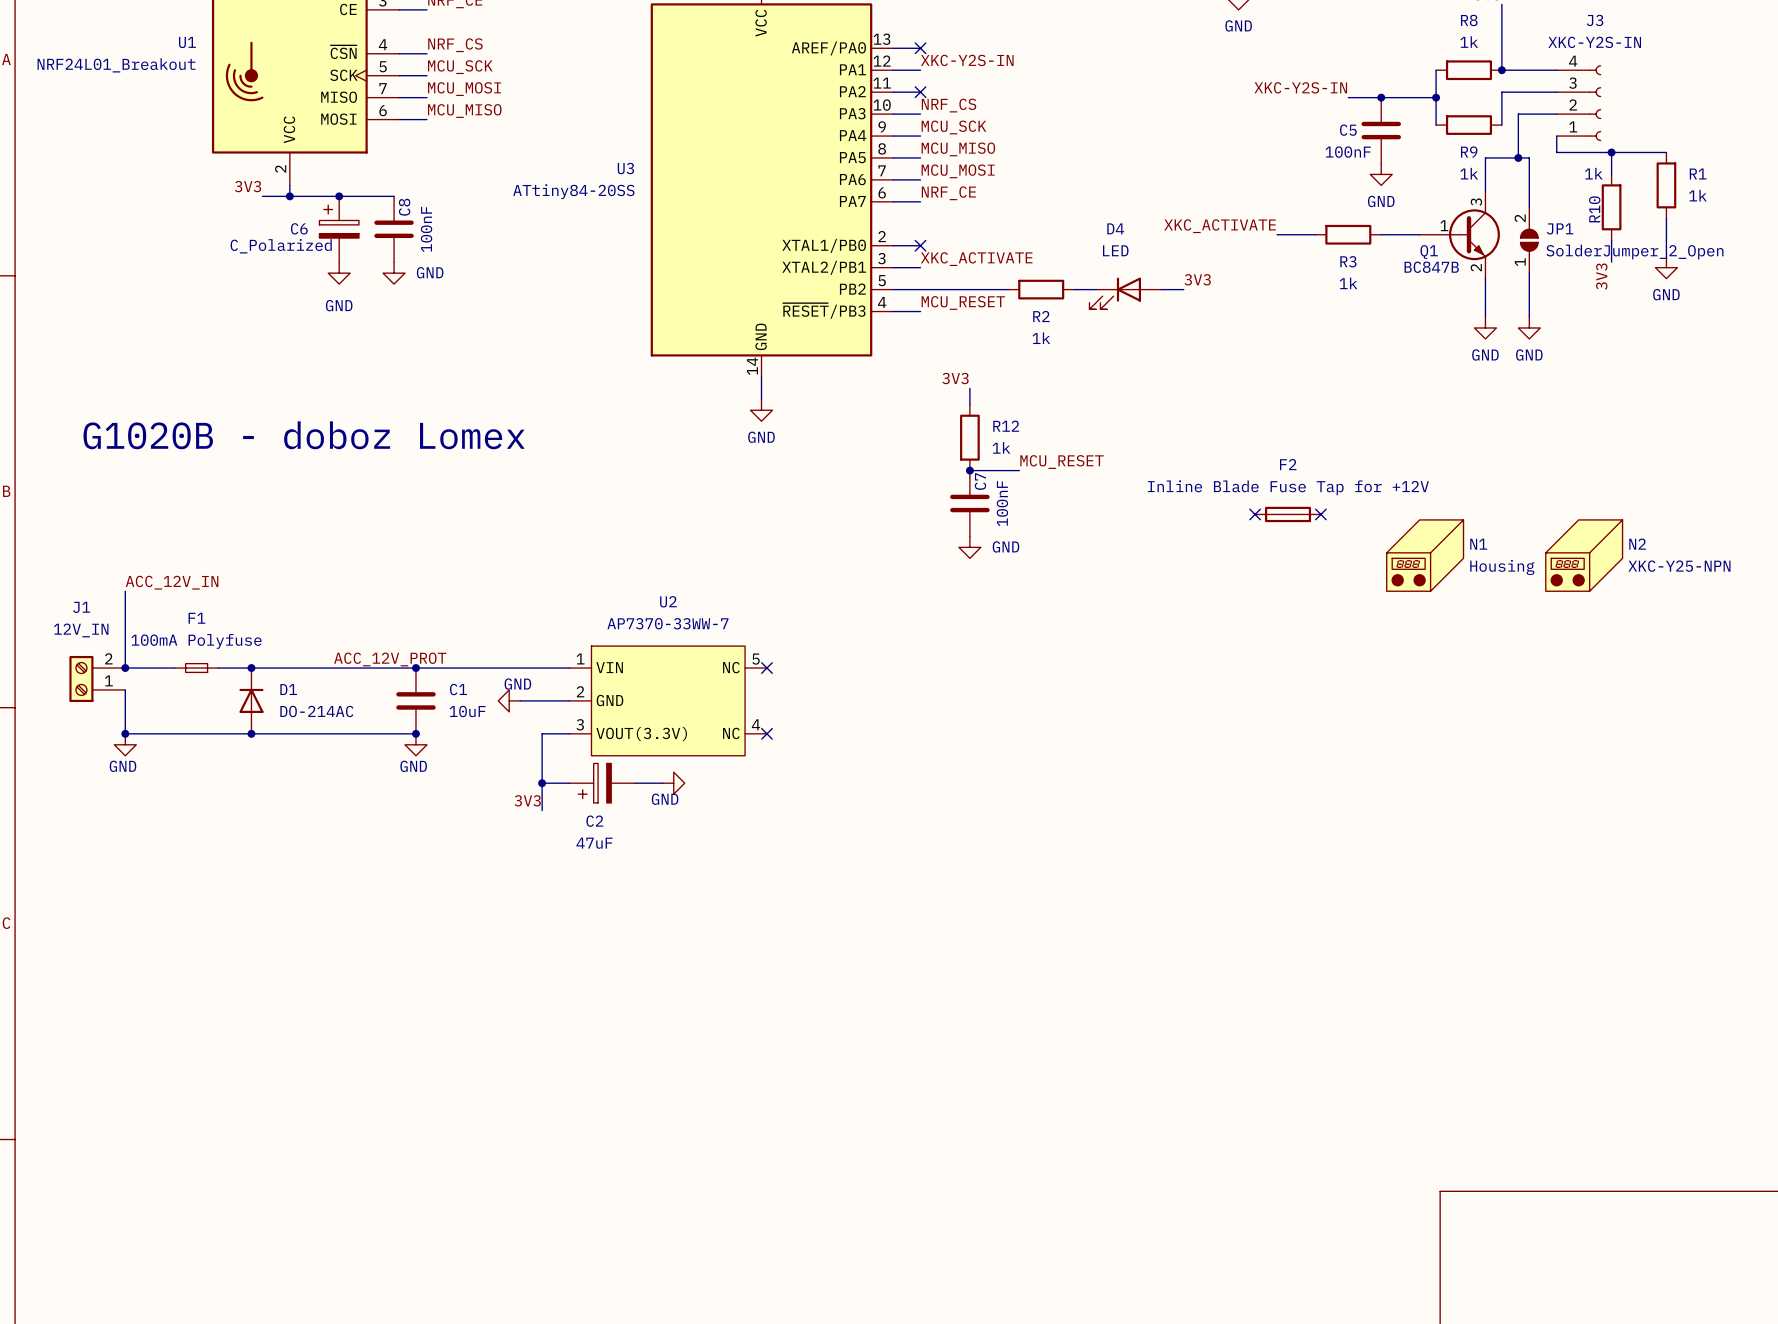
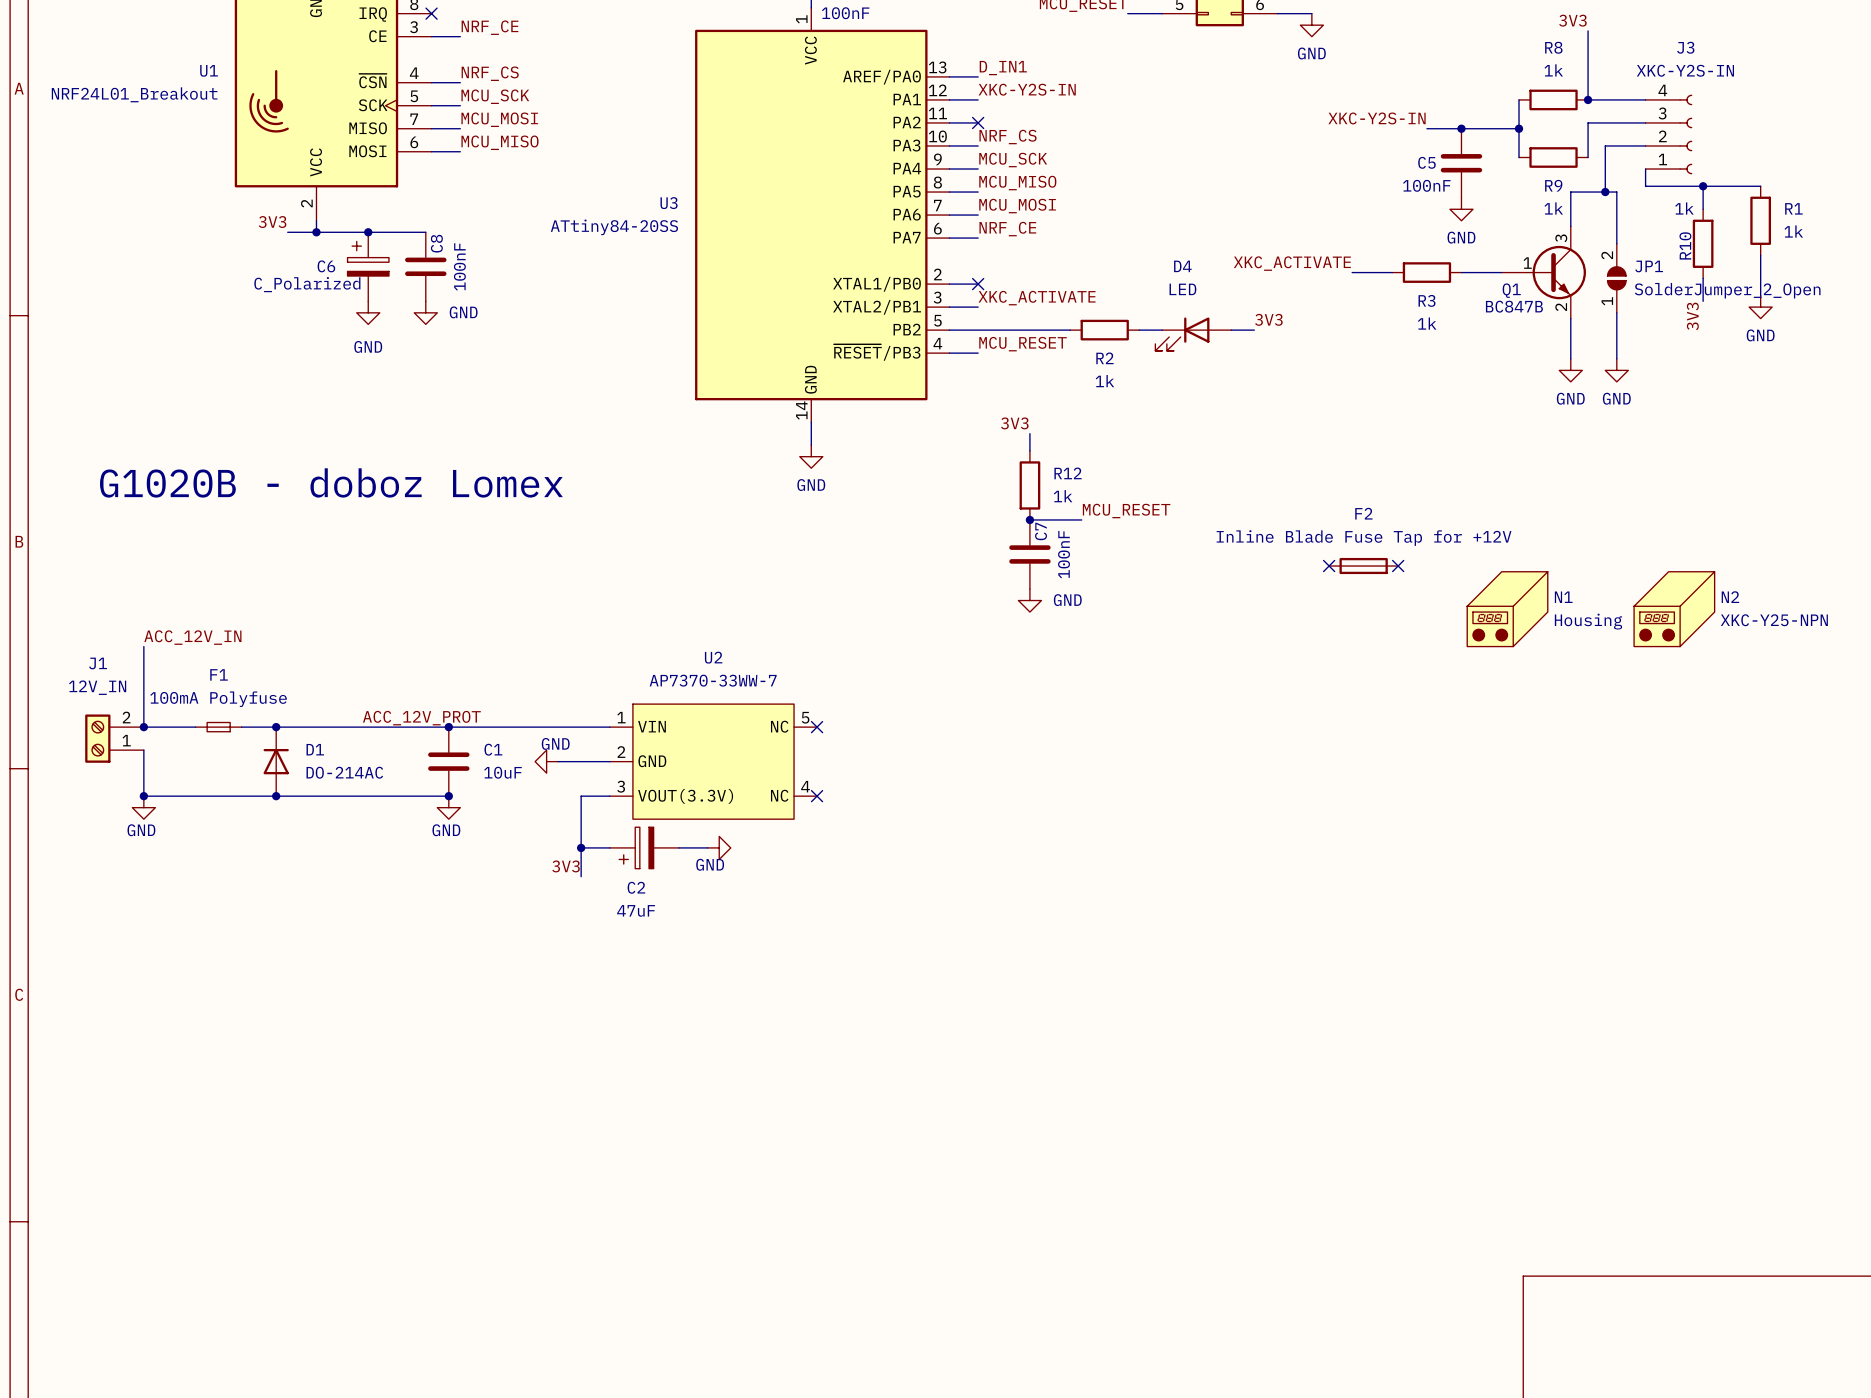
label: none -> D_IN1 (1003, 68)
no-connect mark: (920, 48) -> none

